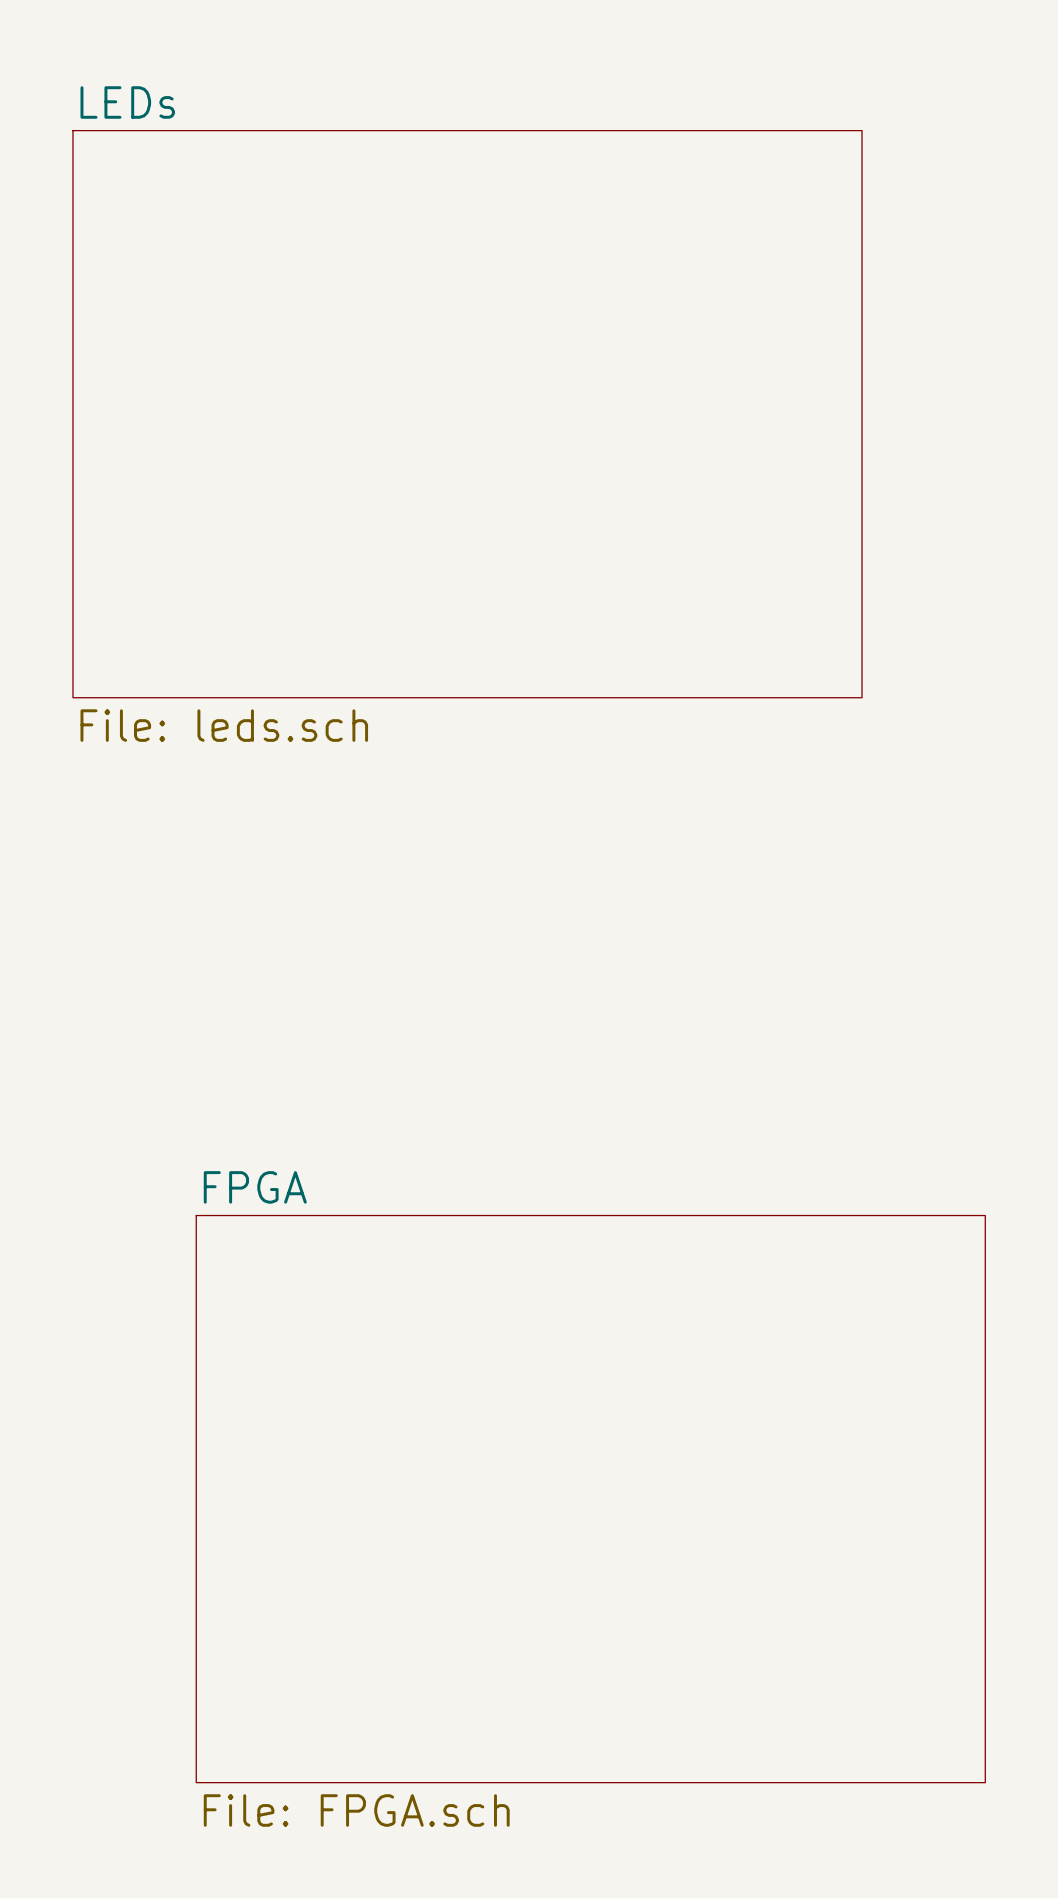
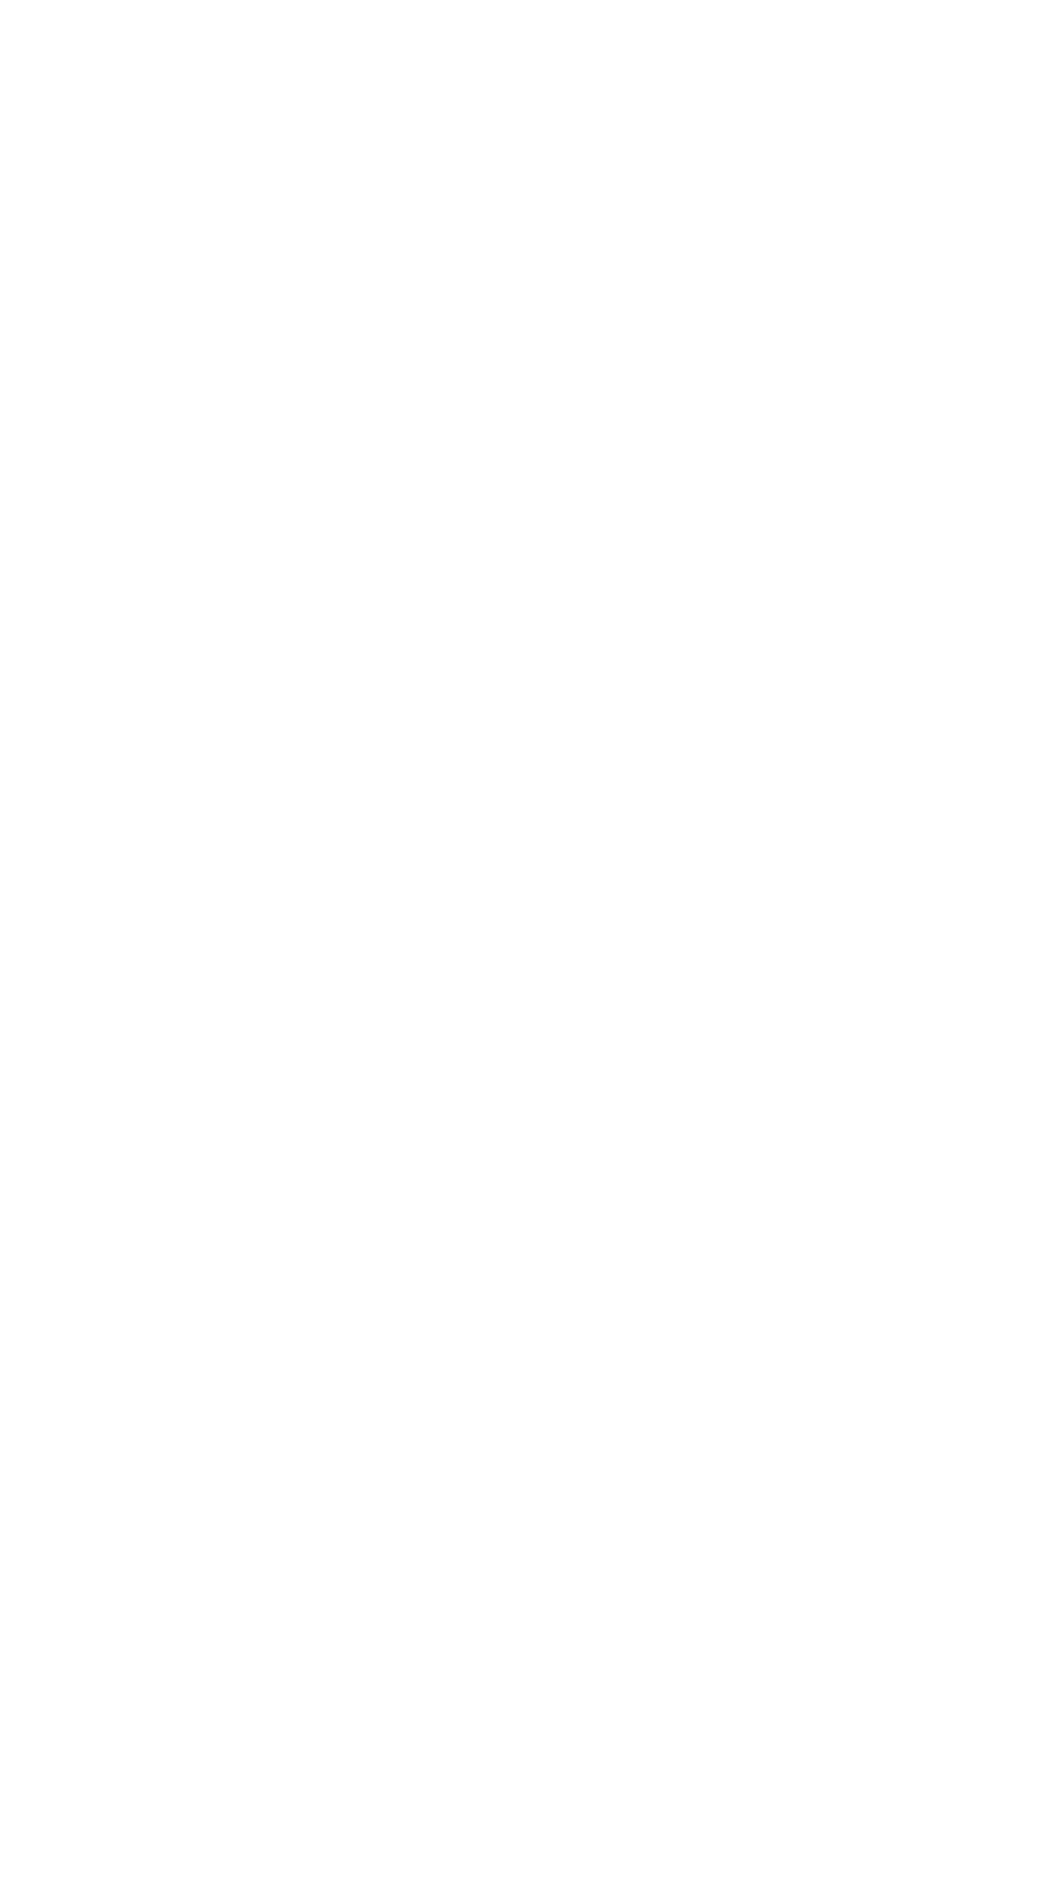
sheet LEDs: File: leds.sch (467, 414) -> none
sheet FPGA: File: FPGA.sch (590, 1499) -> none

